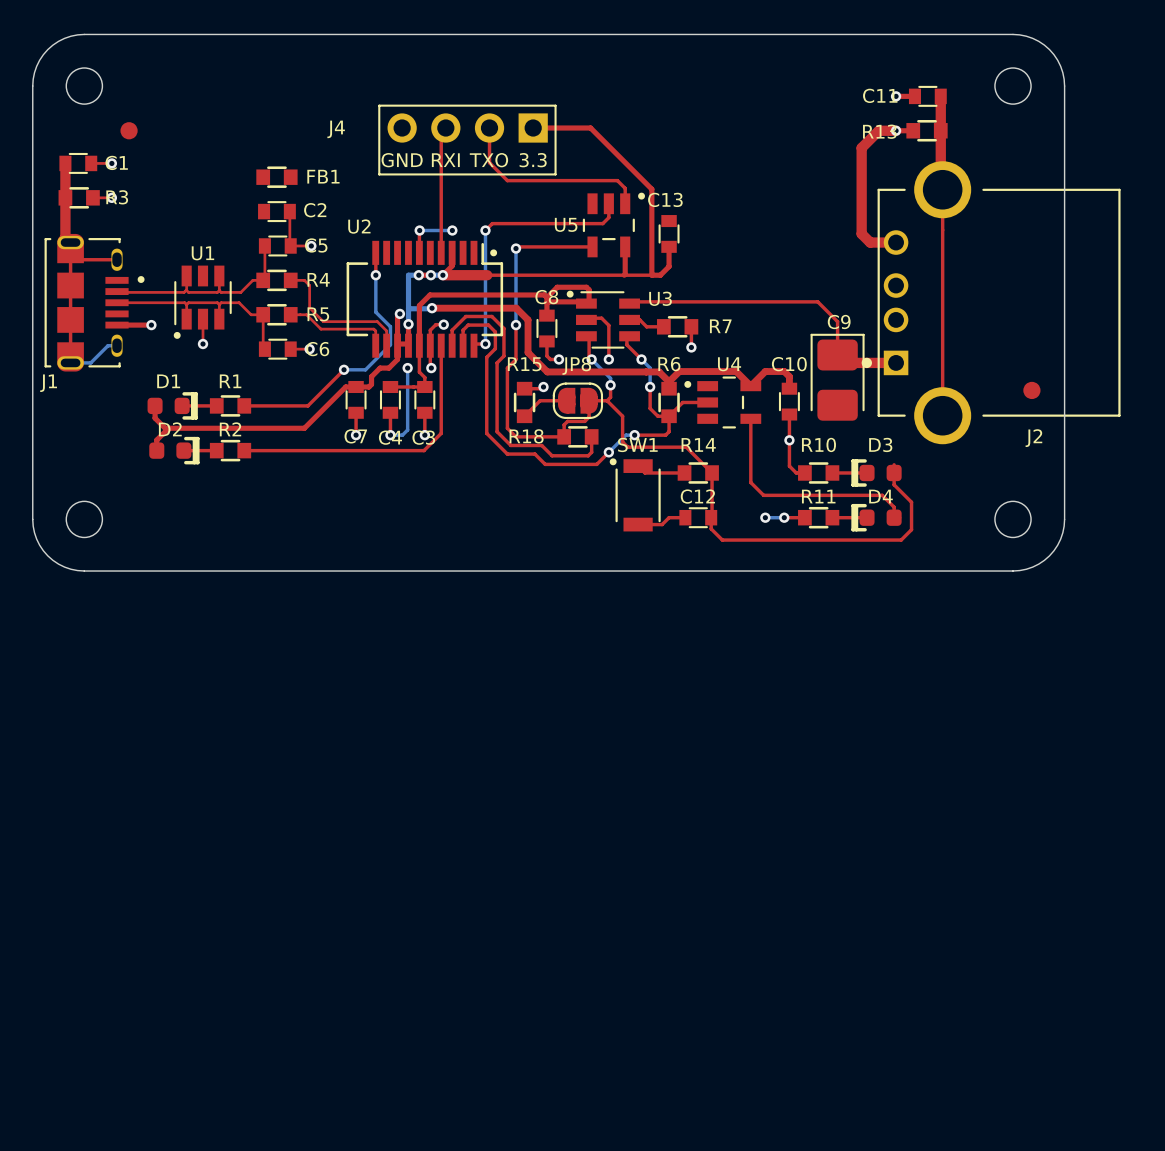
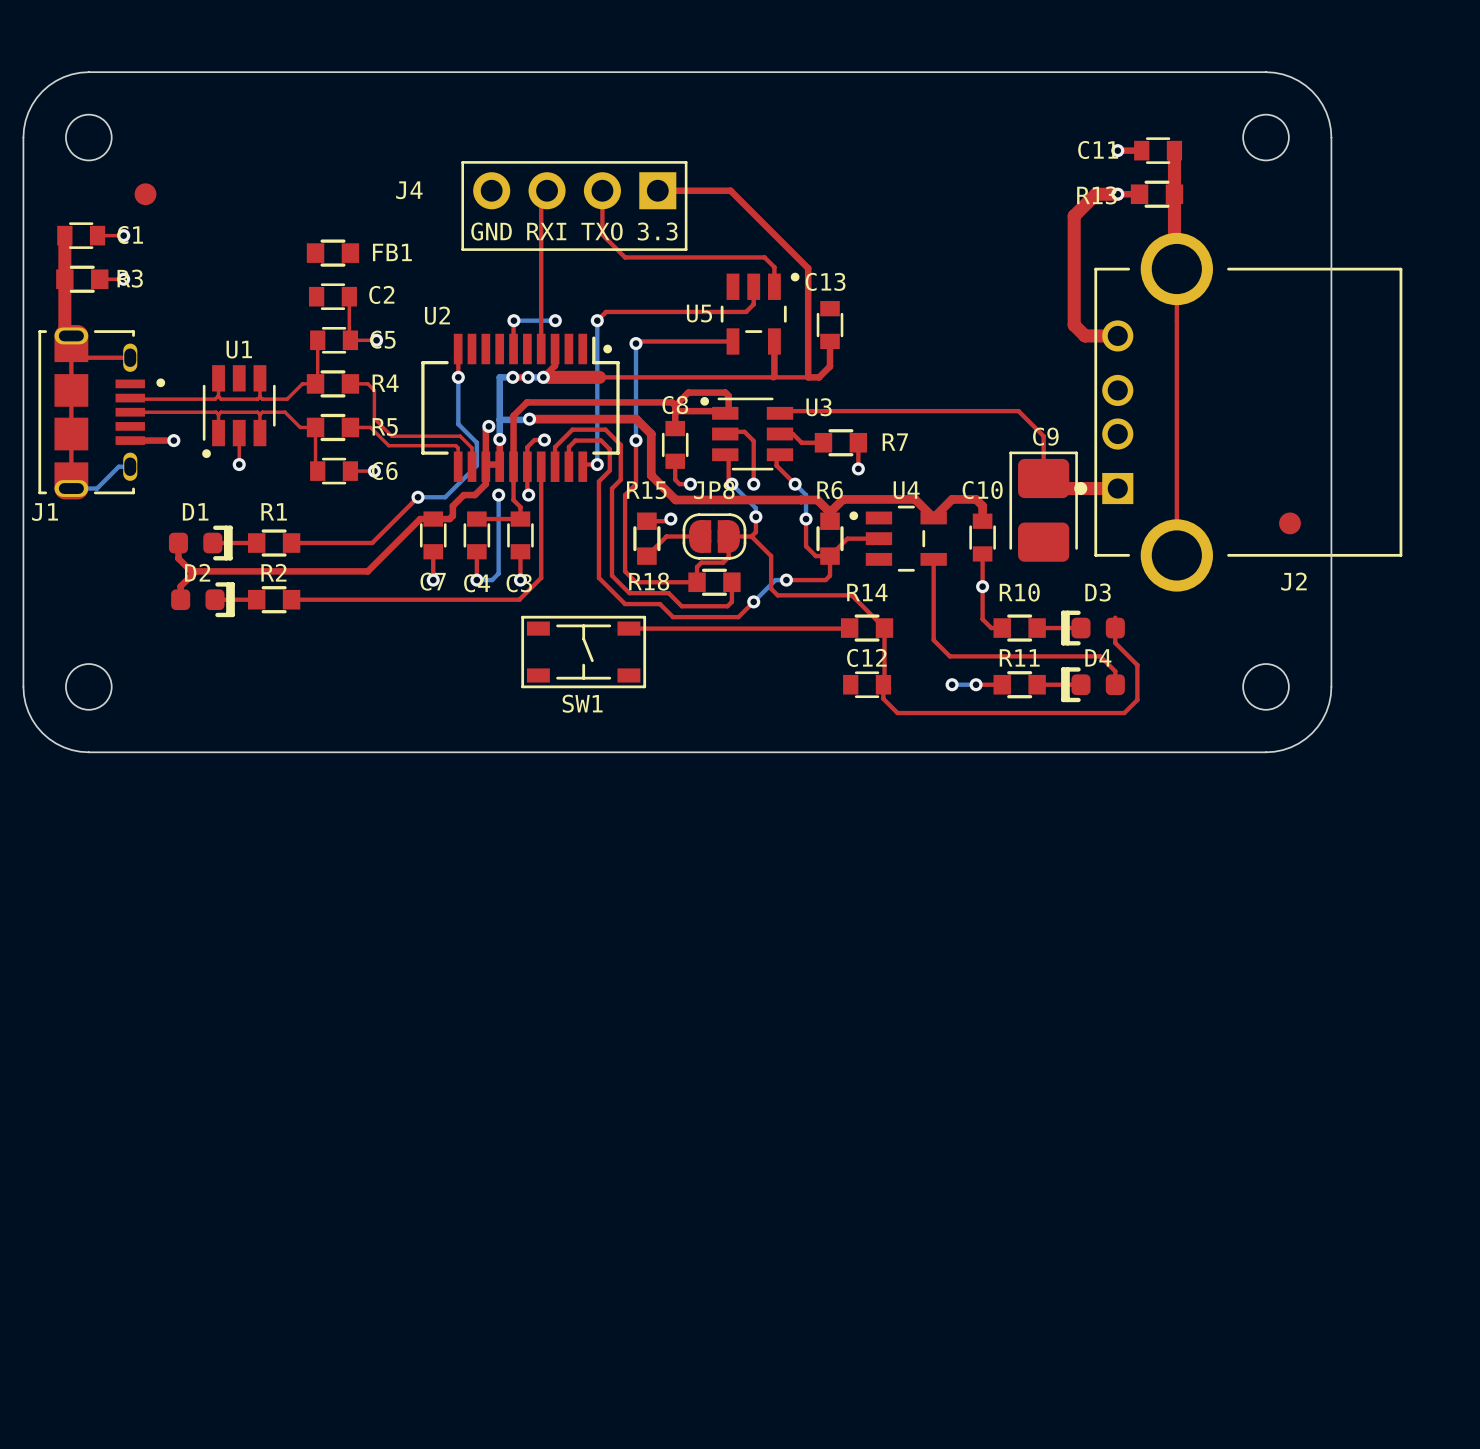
SW1 name position: SW1 (637, 444) -> SW1 (582, 703)
SW1 footprint: [609, 458, 661, 532] -> [521, 615, 647, 689]
top track: (638, 466) (644, 472) (684, 472) -> (628, 628) (849, 628)
top track: (685, 517) (669, 517) (662, 524) (638, 524) -> none

